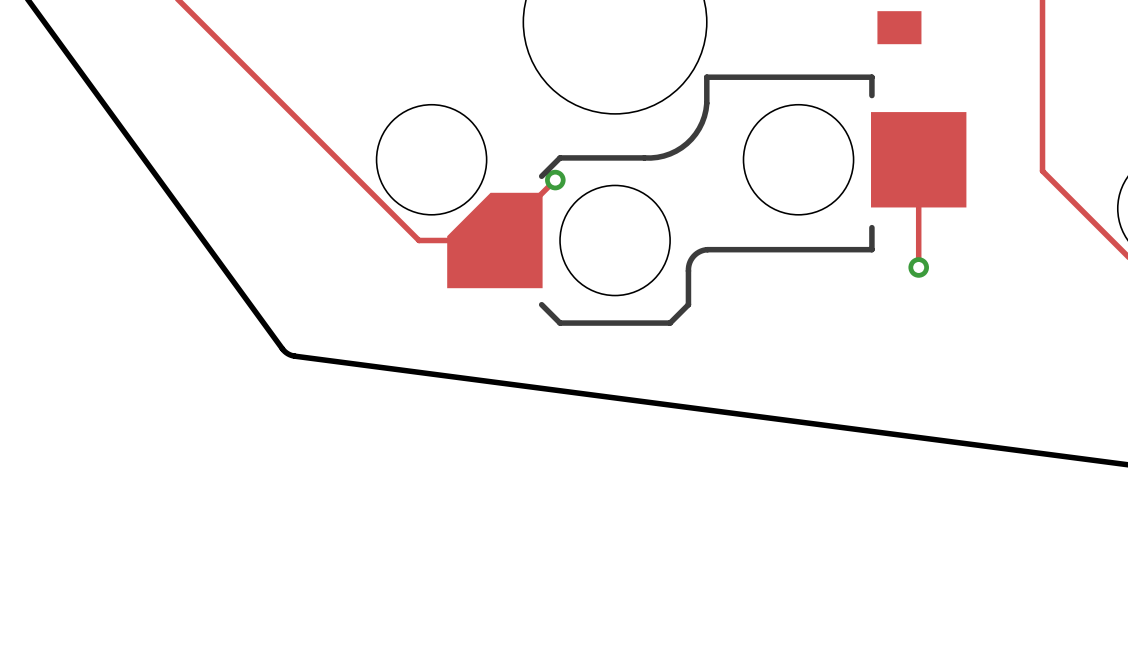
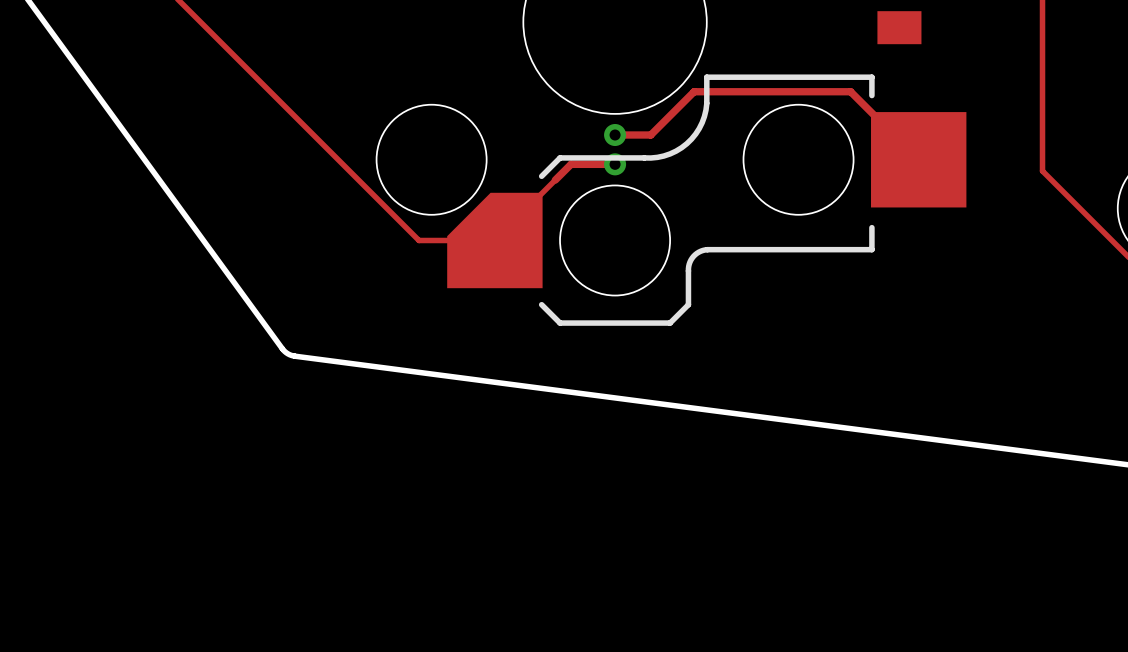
via: none -> (615, 135)
track: (918, 159) (918, 267) -> (918, 159) (850, 91) (694, 91) (650, 135) (615, 135)
track: none -> (615, 164) (571, 164) (555, 180)
via: none -> (615, 164)
via: (555, 180) -> none
via: (918, 267) -> none

